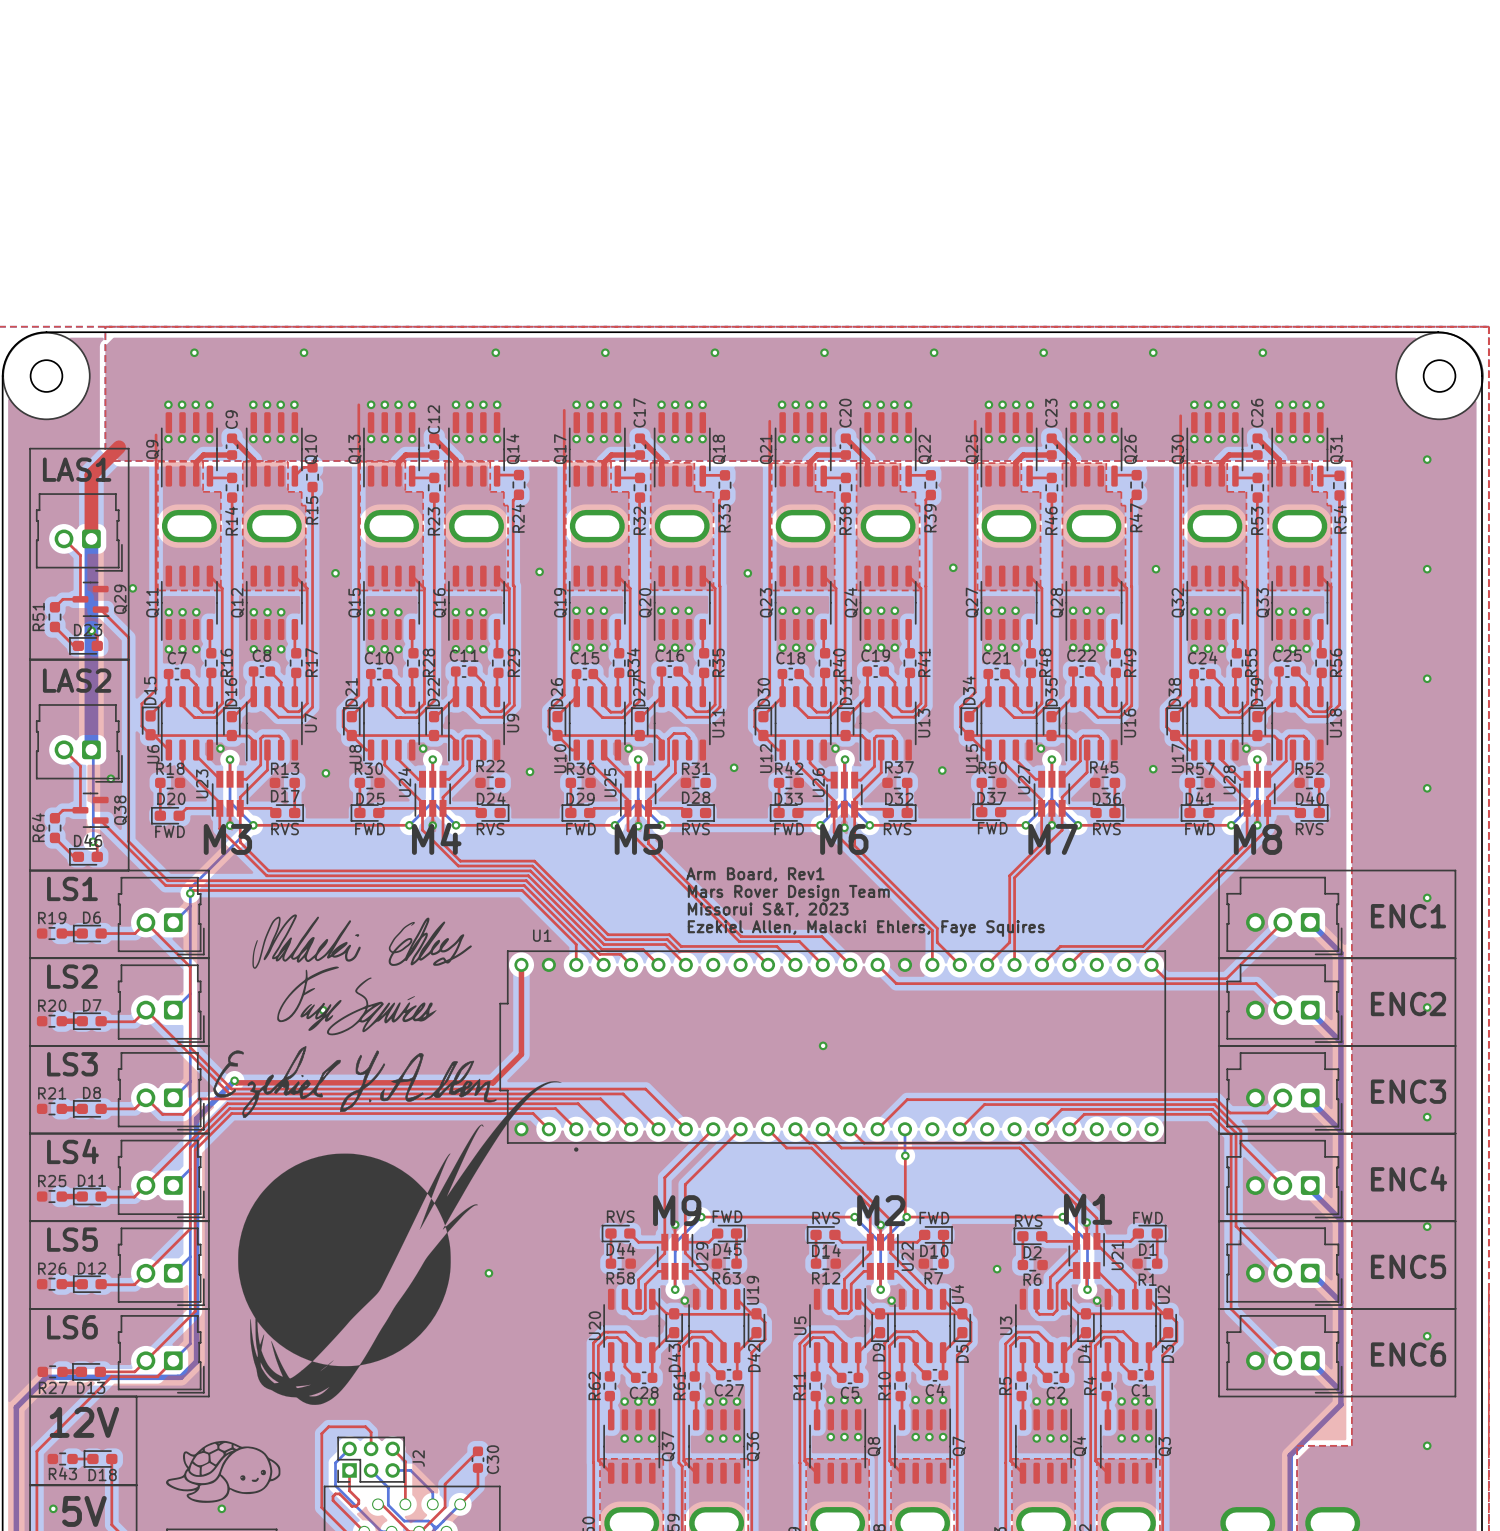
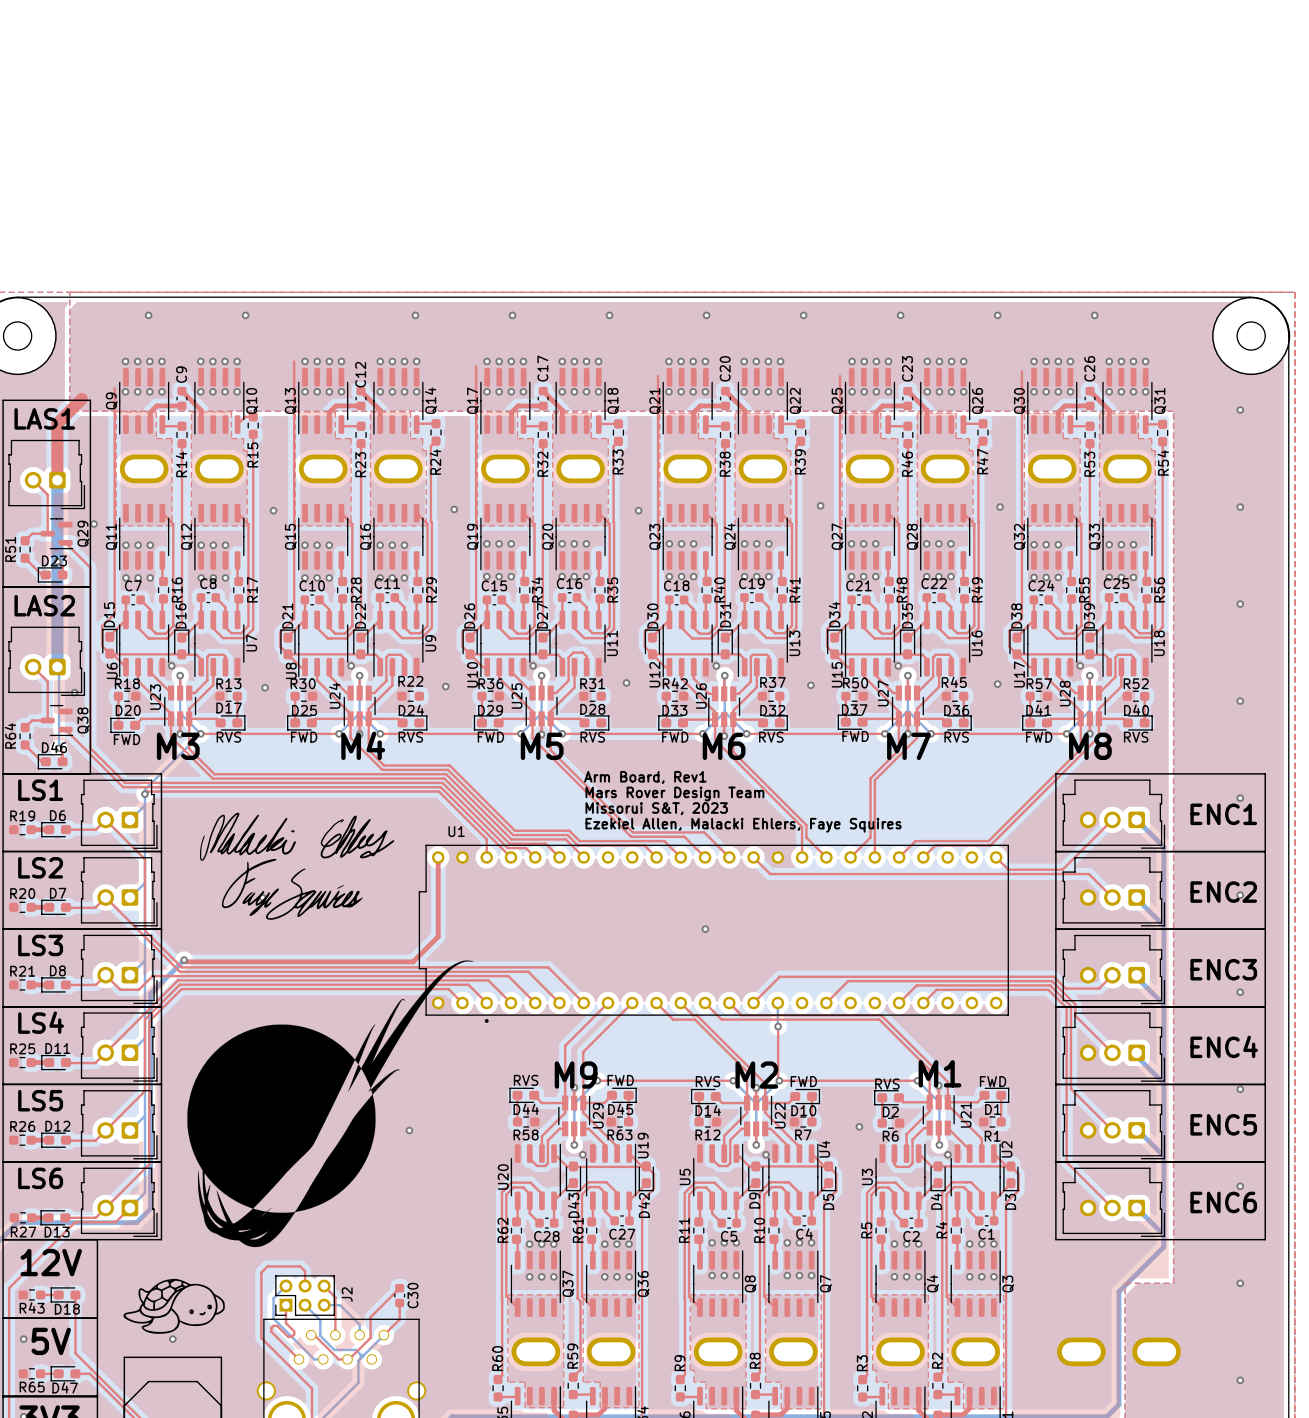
drawing: [213, 1046, 497, 1118] -> none

